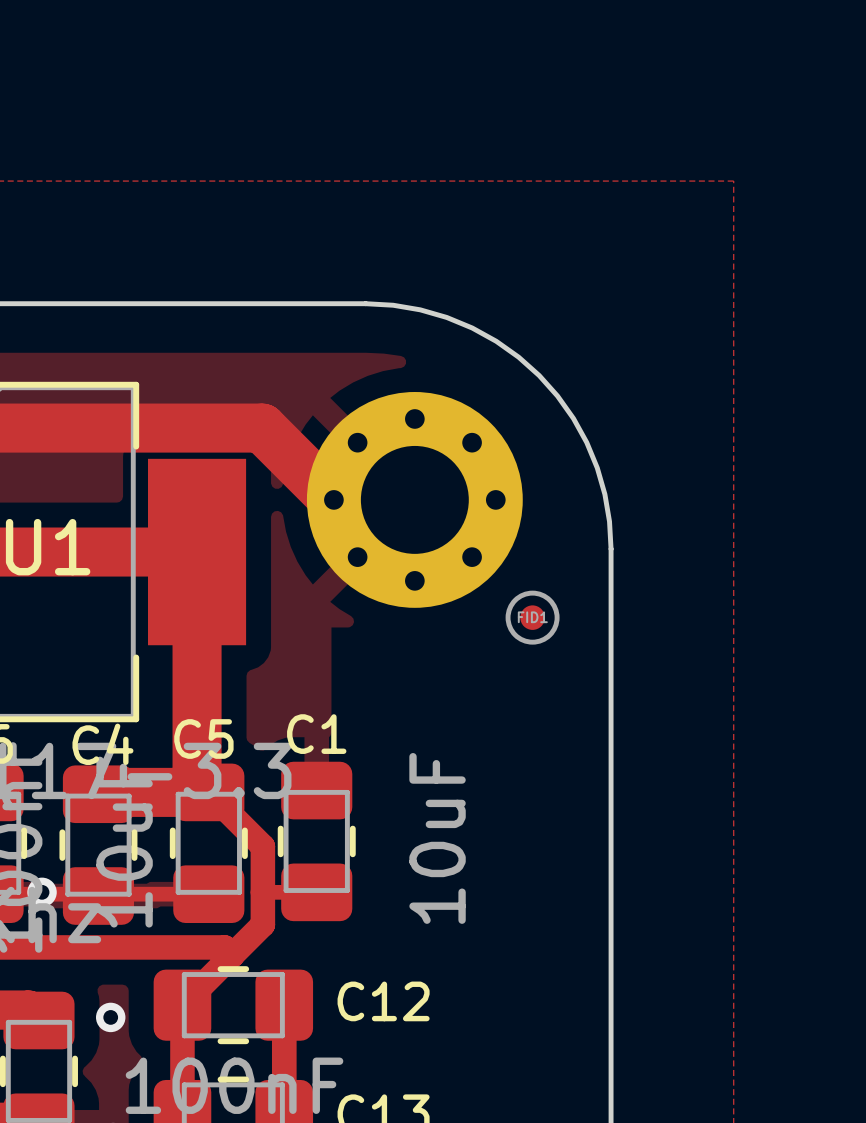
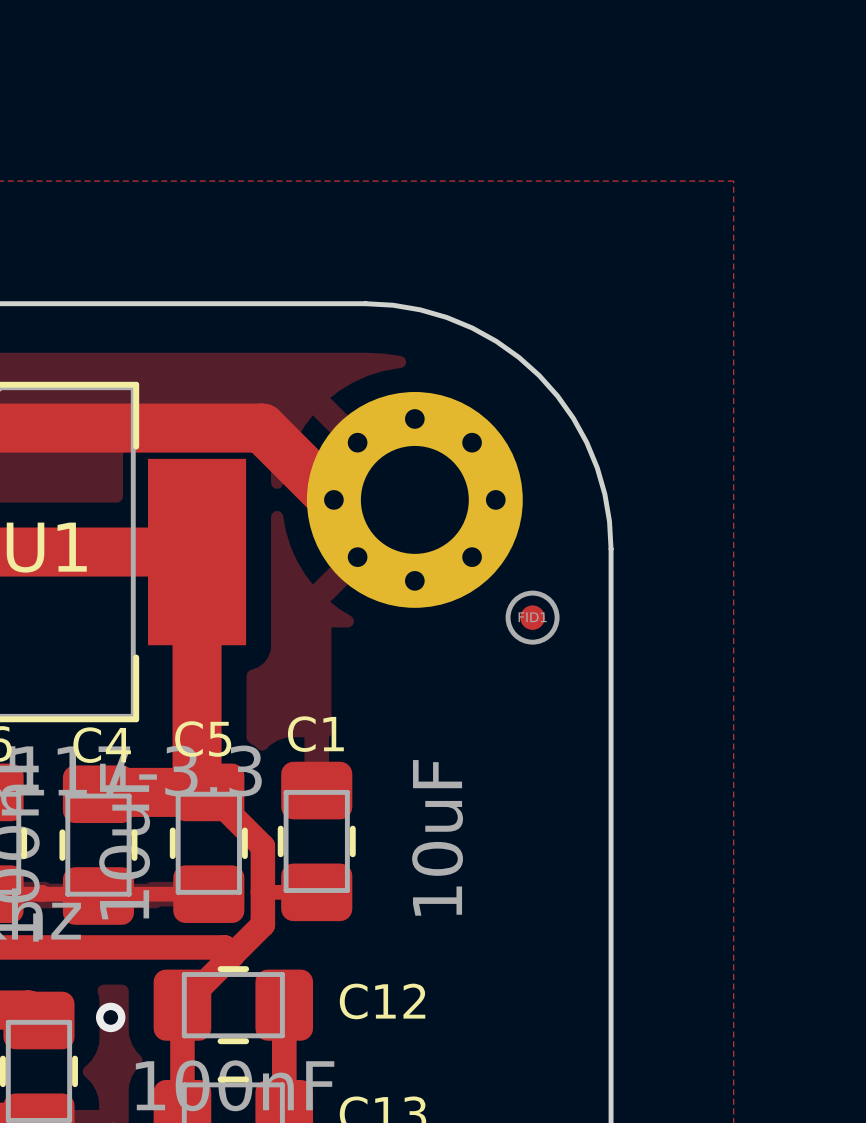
via: (42, 892) -> none

